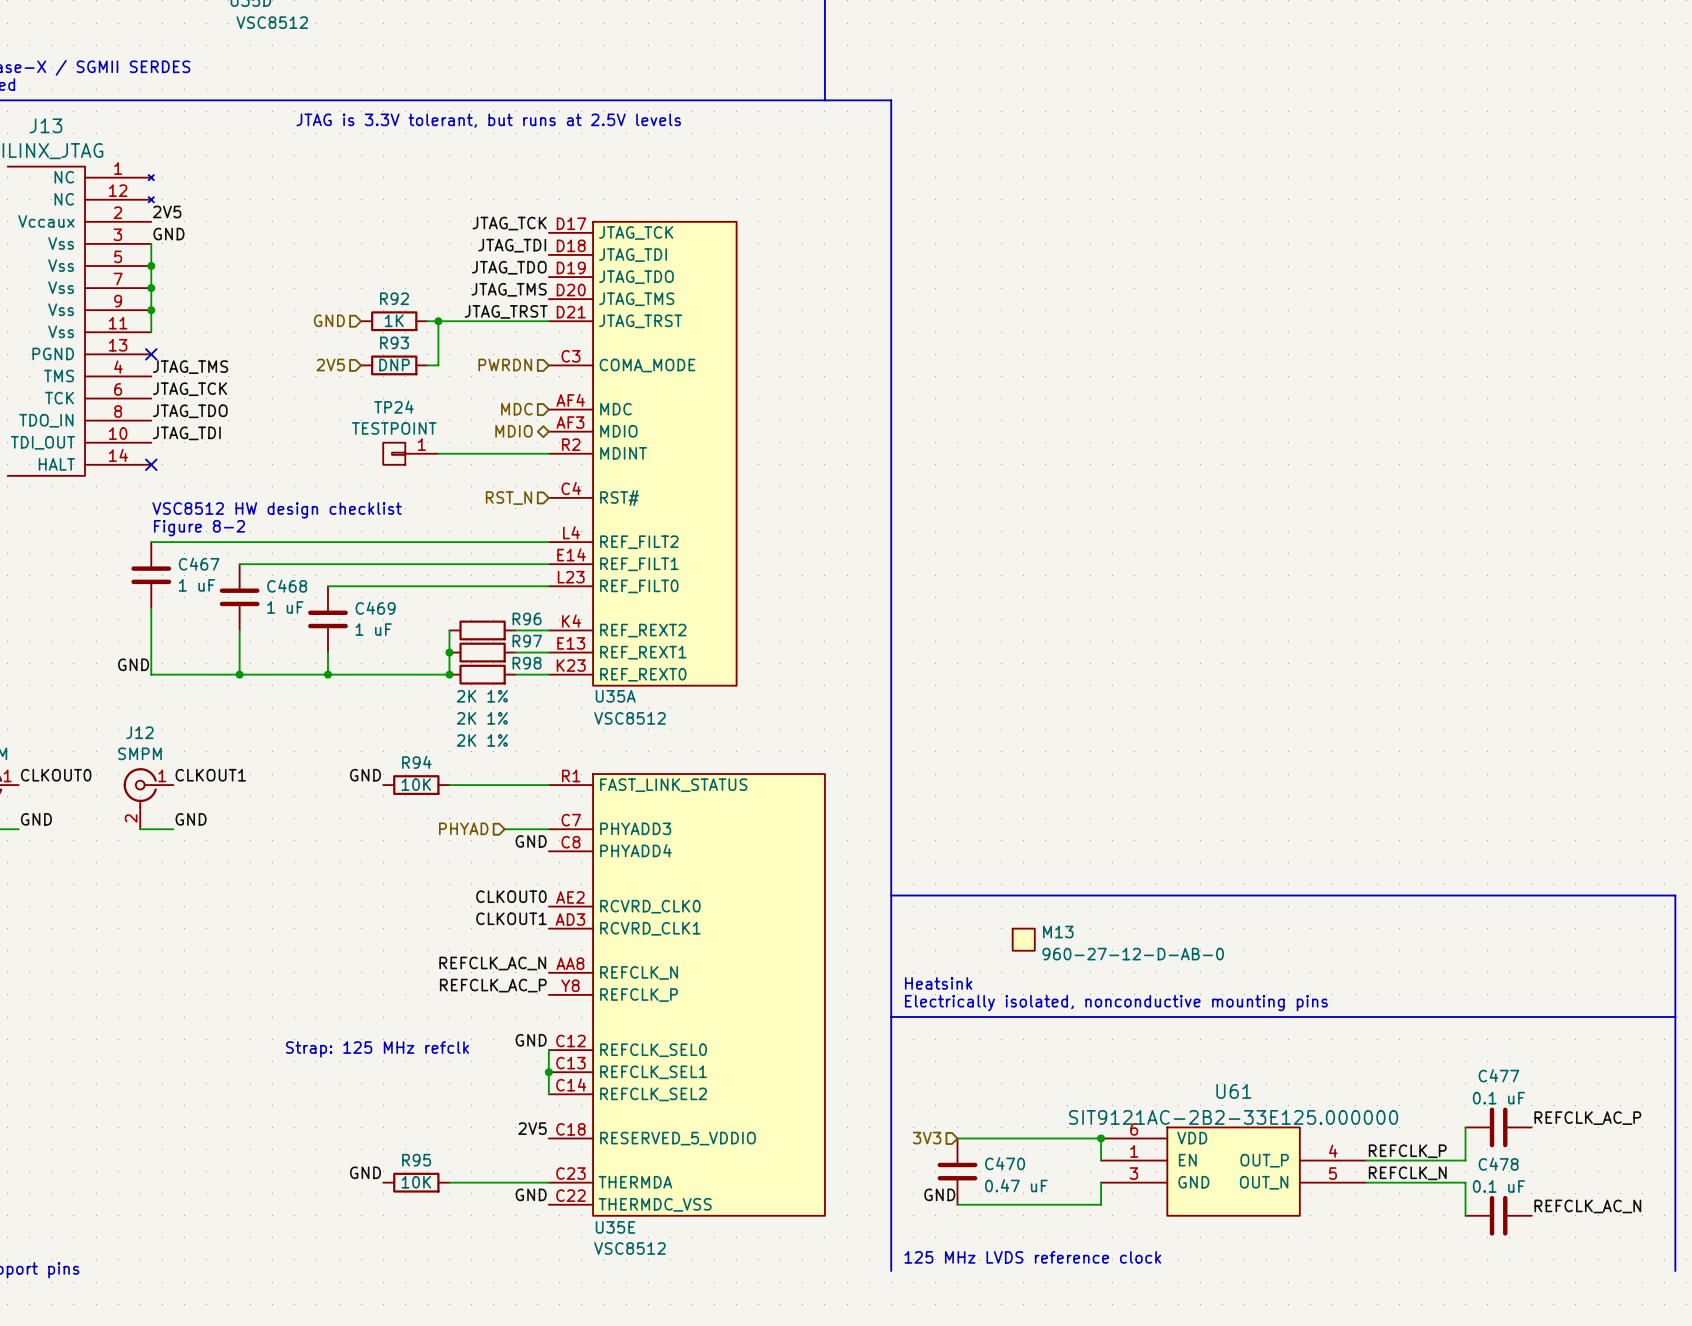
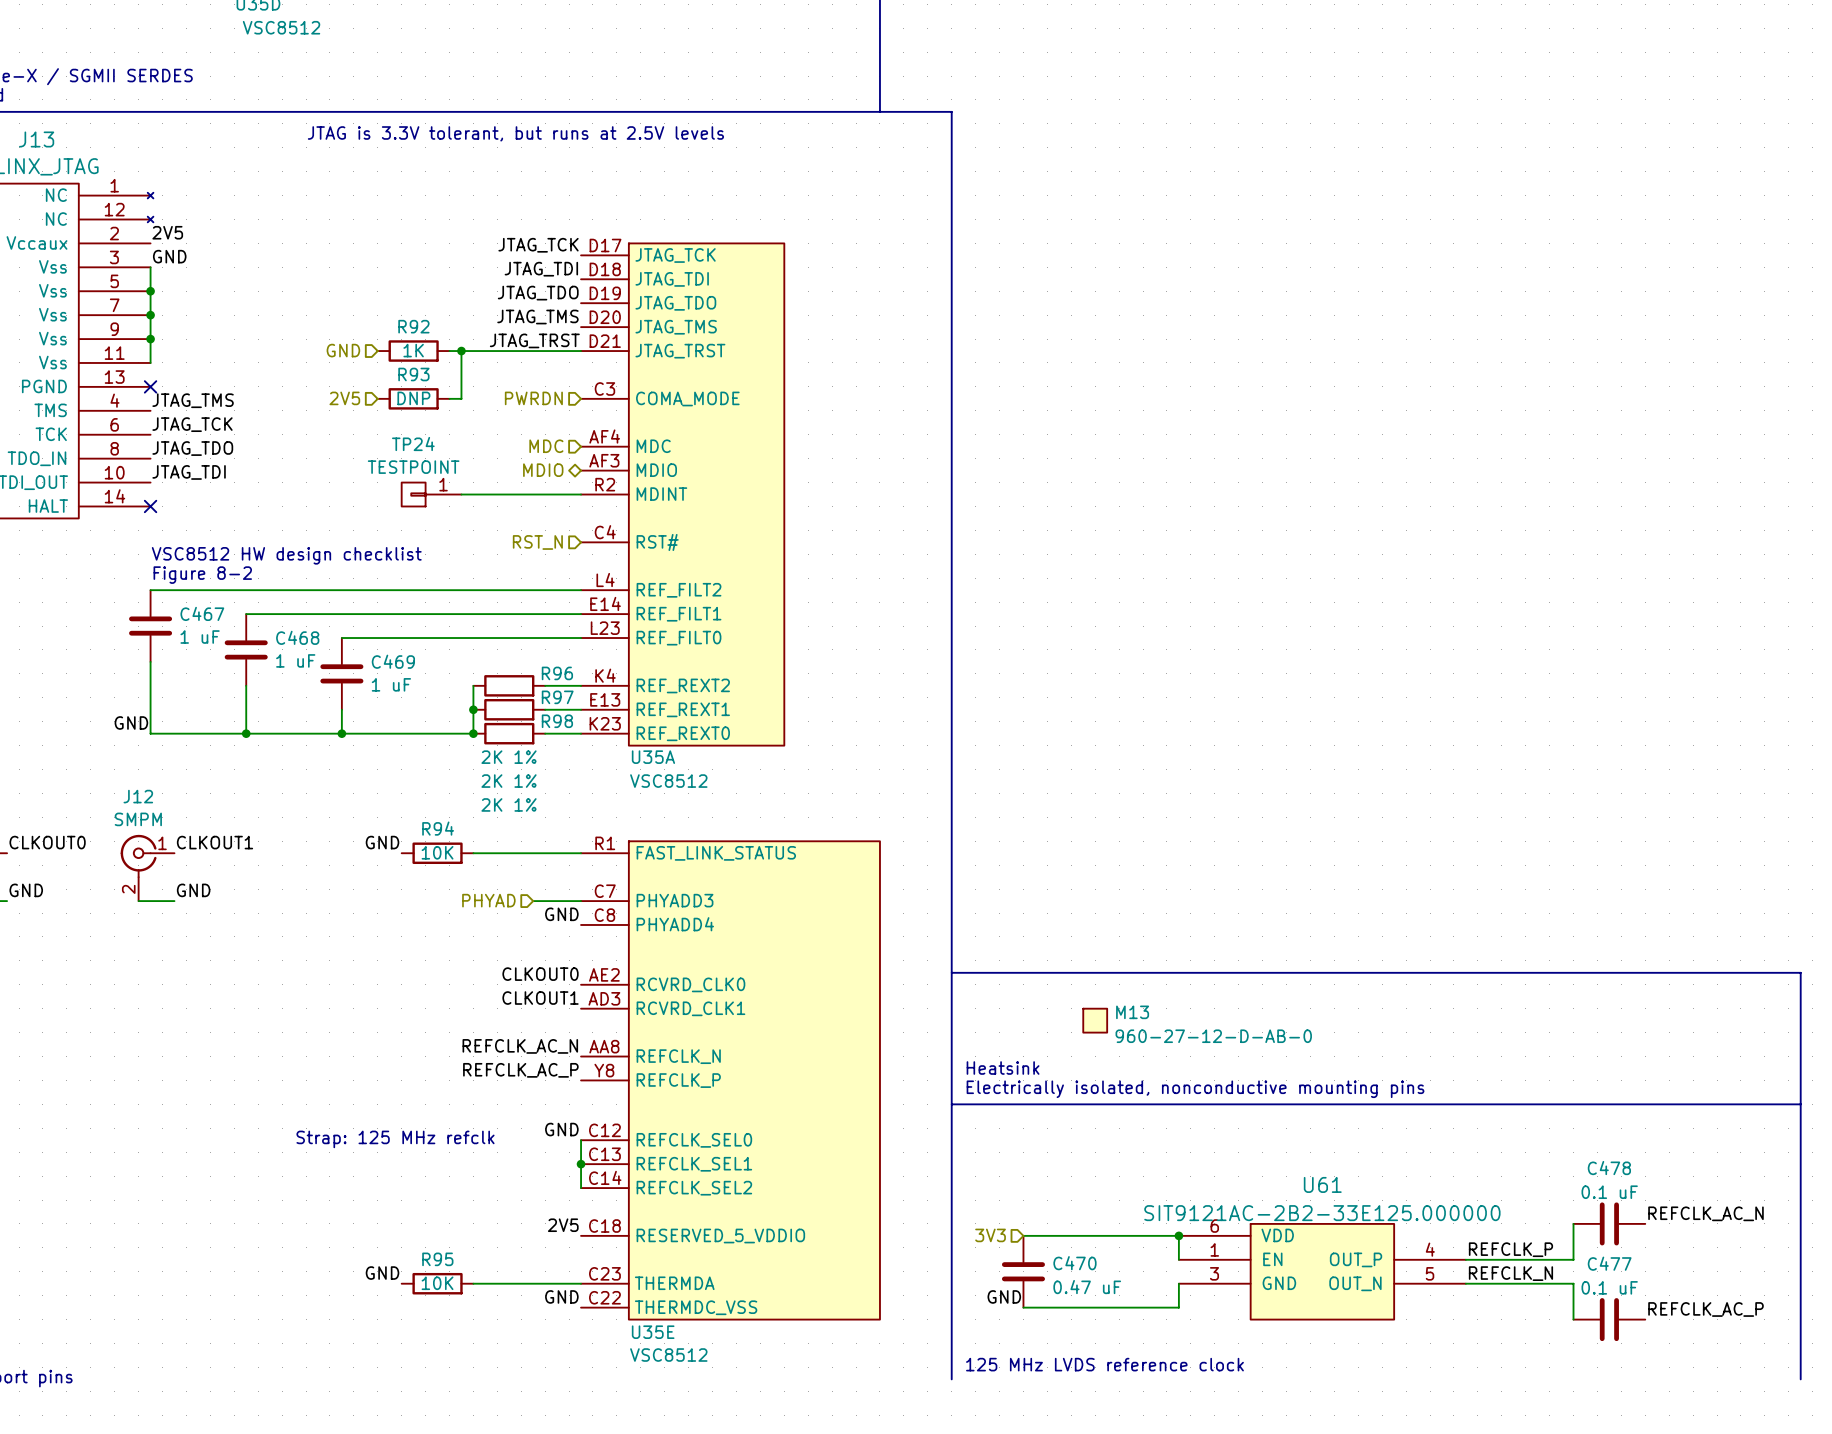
C477 name: C477 (1498, 1075) -> C478 (1609, 1168)
label: REFCLK_AC_P (1587, 1118) -> REFCLK_AC_N (1705, 1213)
C478 name: C478 (1498, 1164) -> C477 (1609, 1263)
label: REFCLK_AC_N (1587, 1206) -> REFCLK_AC_P (1705, 1309)

